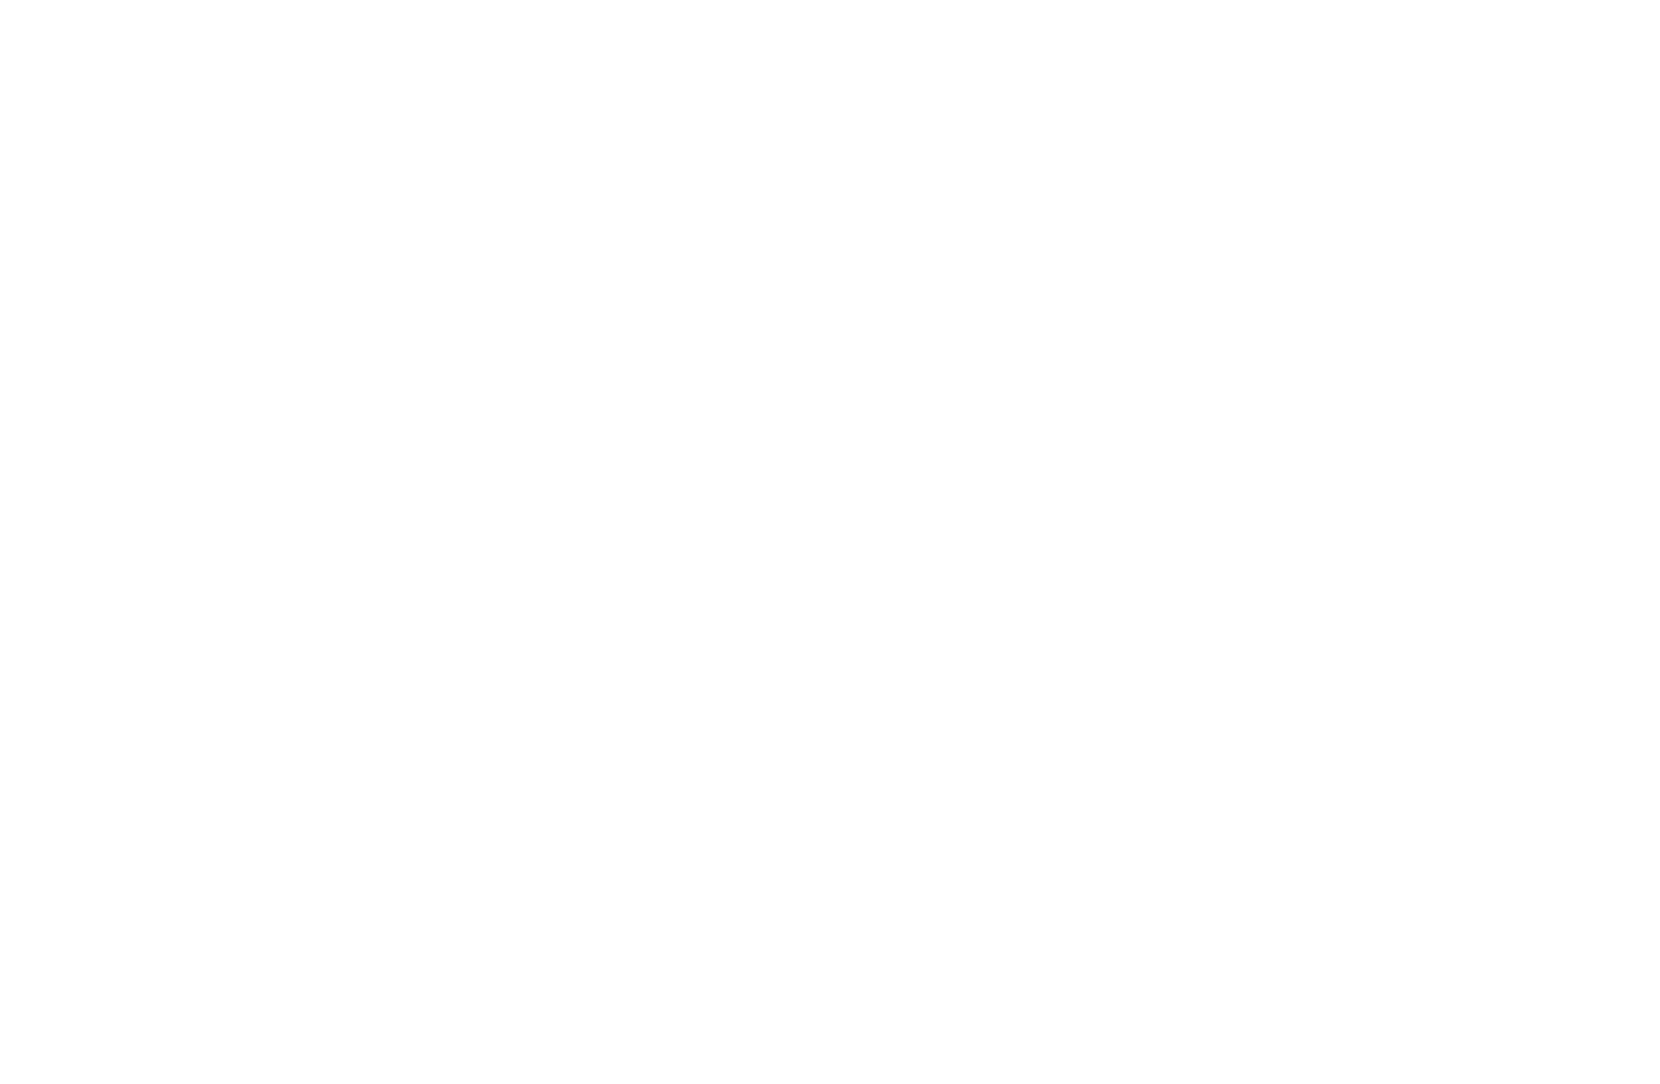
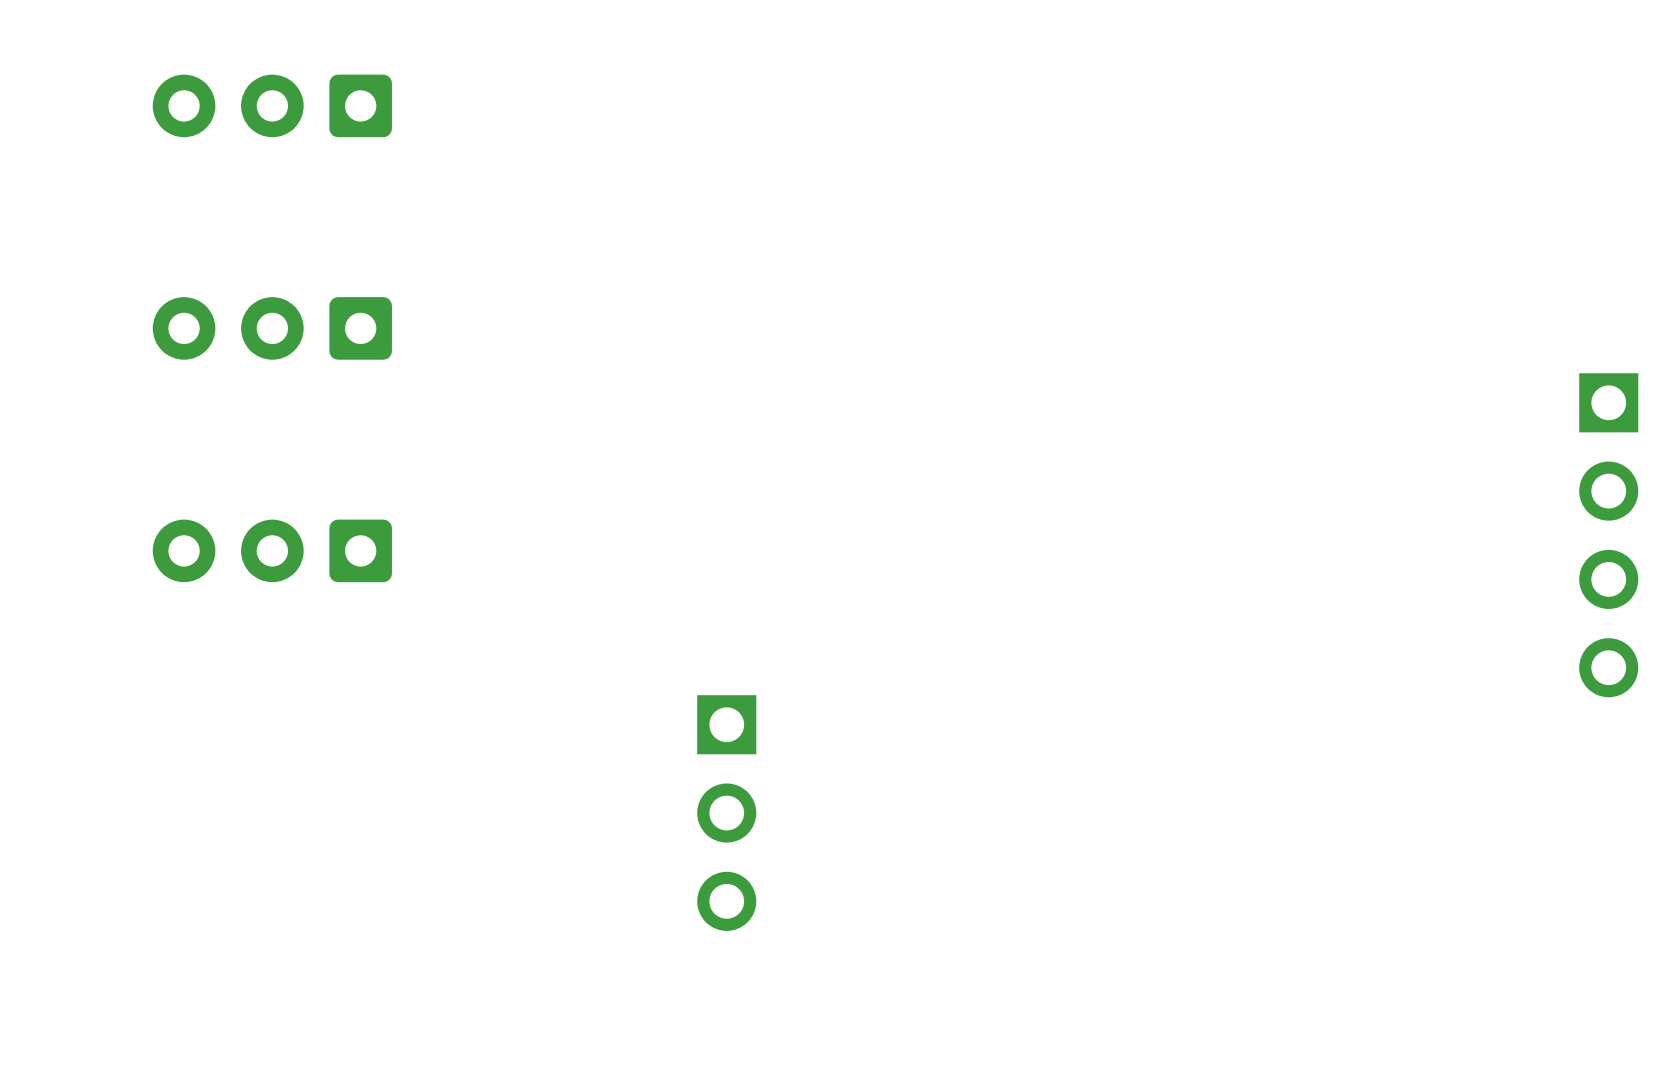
part: none -> (272, 105)
part: none -> (272, 328)
part: none -> (1608, 535)
part: none -> (272, 550)
part: none -> (726, 813)

